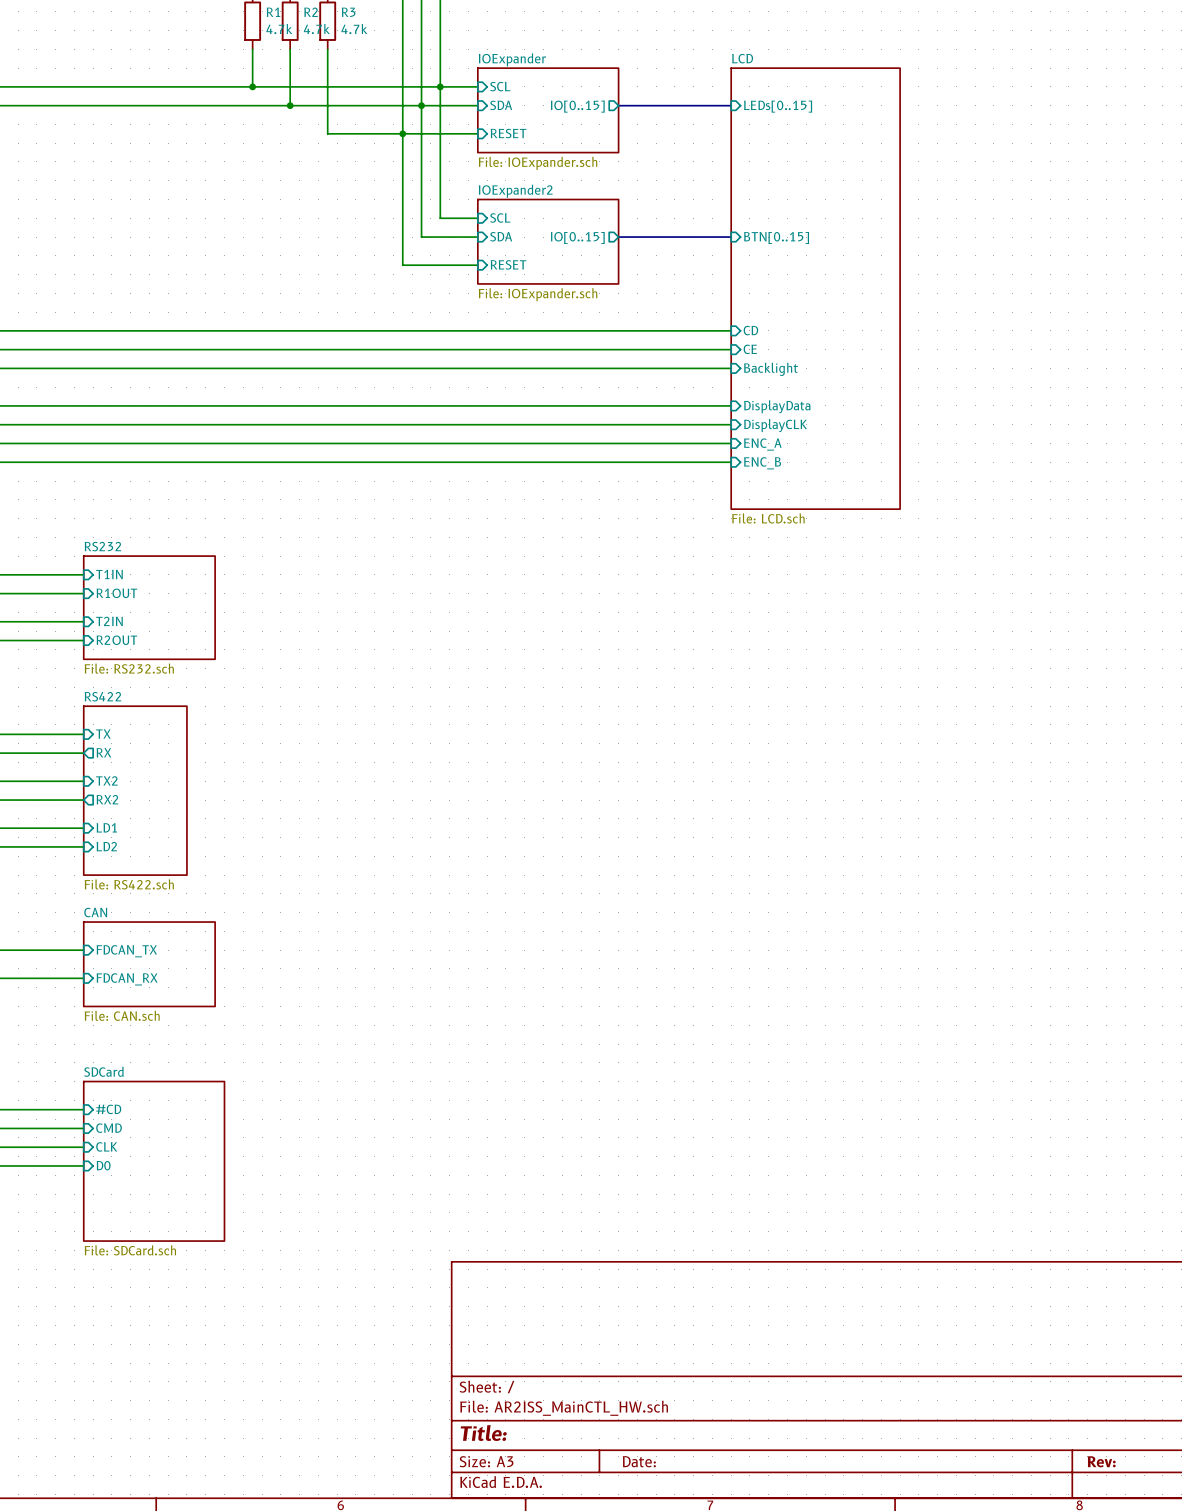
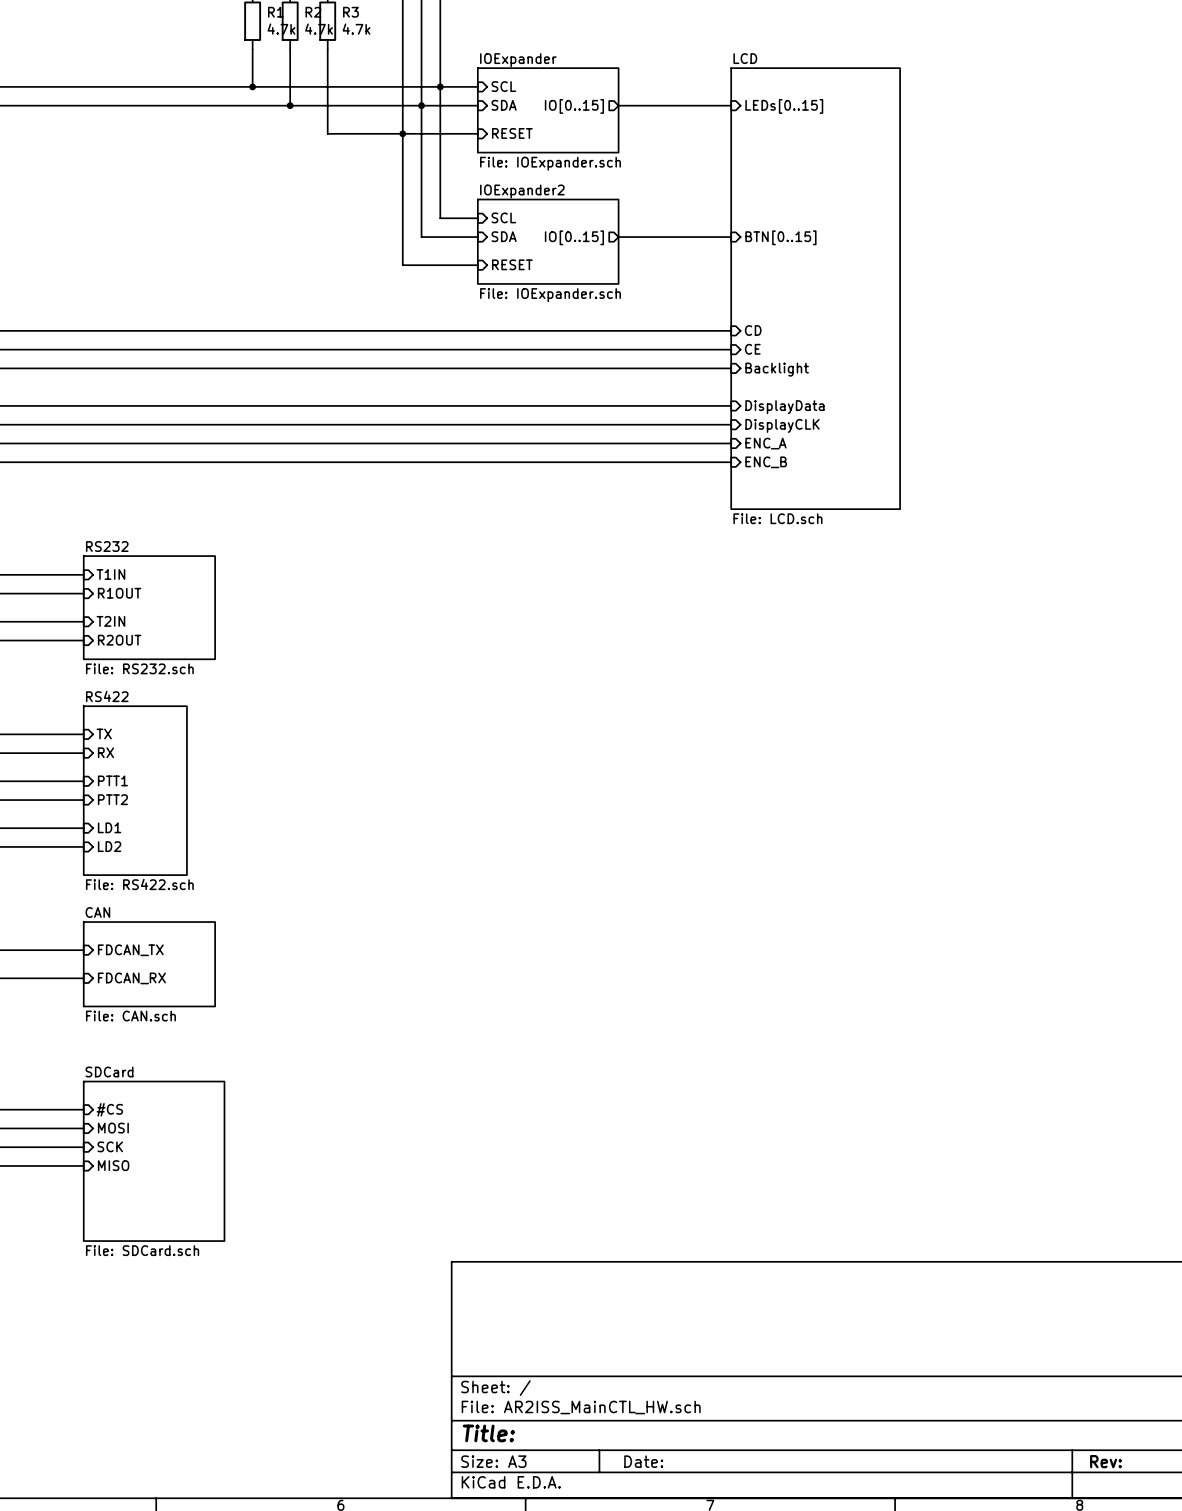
sheet pin shape: output (103, 752) -> input (106, 752)
sheet pin: TX2 (106, 780) -> PTT1 (112, 780)
sheet pin shape: output (107, 799) -> input (112, 799)
sheet pin: RX2 (107, 799) -> PTT2 (112, 799)
sheet pin: #CD (108, 1109) -> #CS (109, 1109)
sheet pin: CMD (109, 1128) -> MOSI (113, 1128)
sheet pin: CLK (106, 1146) -> SCK (110, 1146)
sheet pin: D0 (103, 1165) -> MISO (113, 1165)

